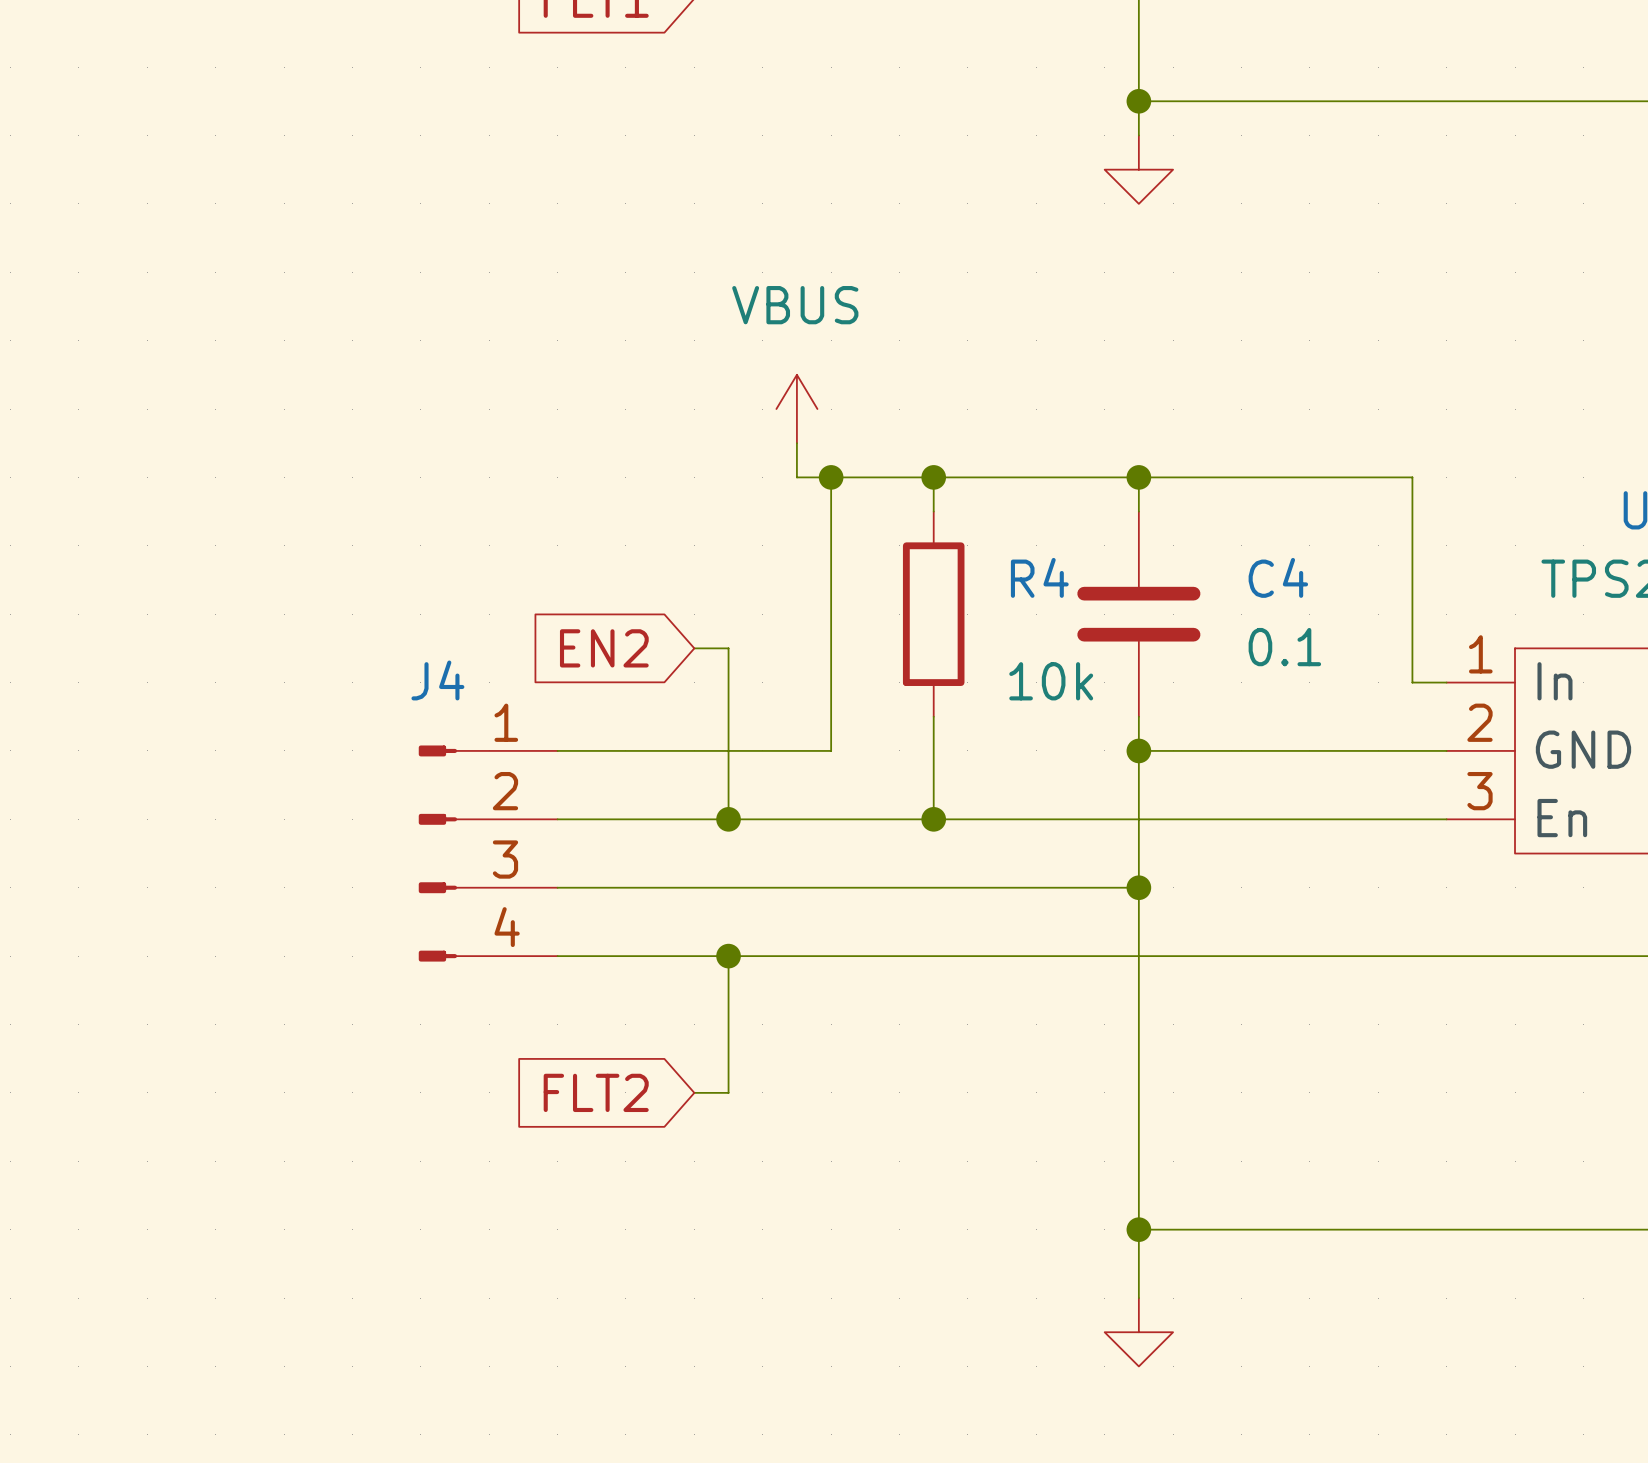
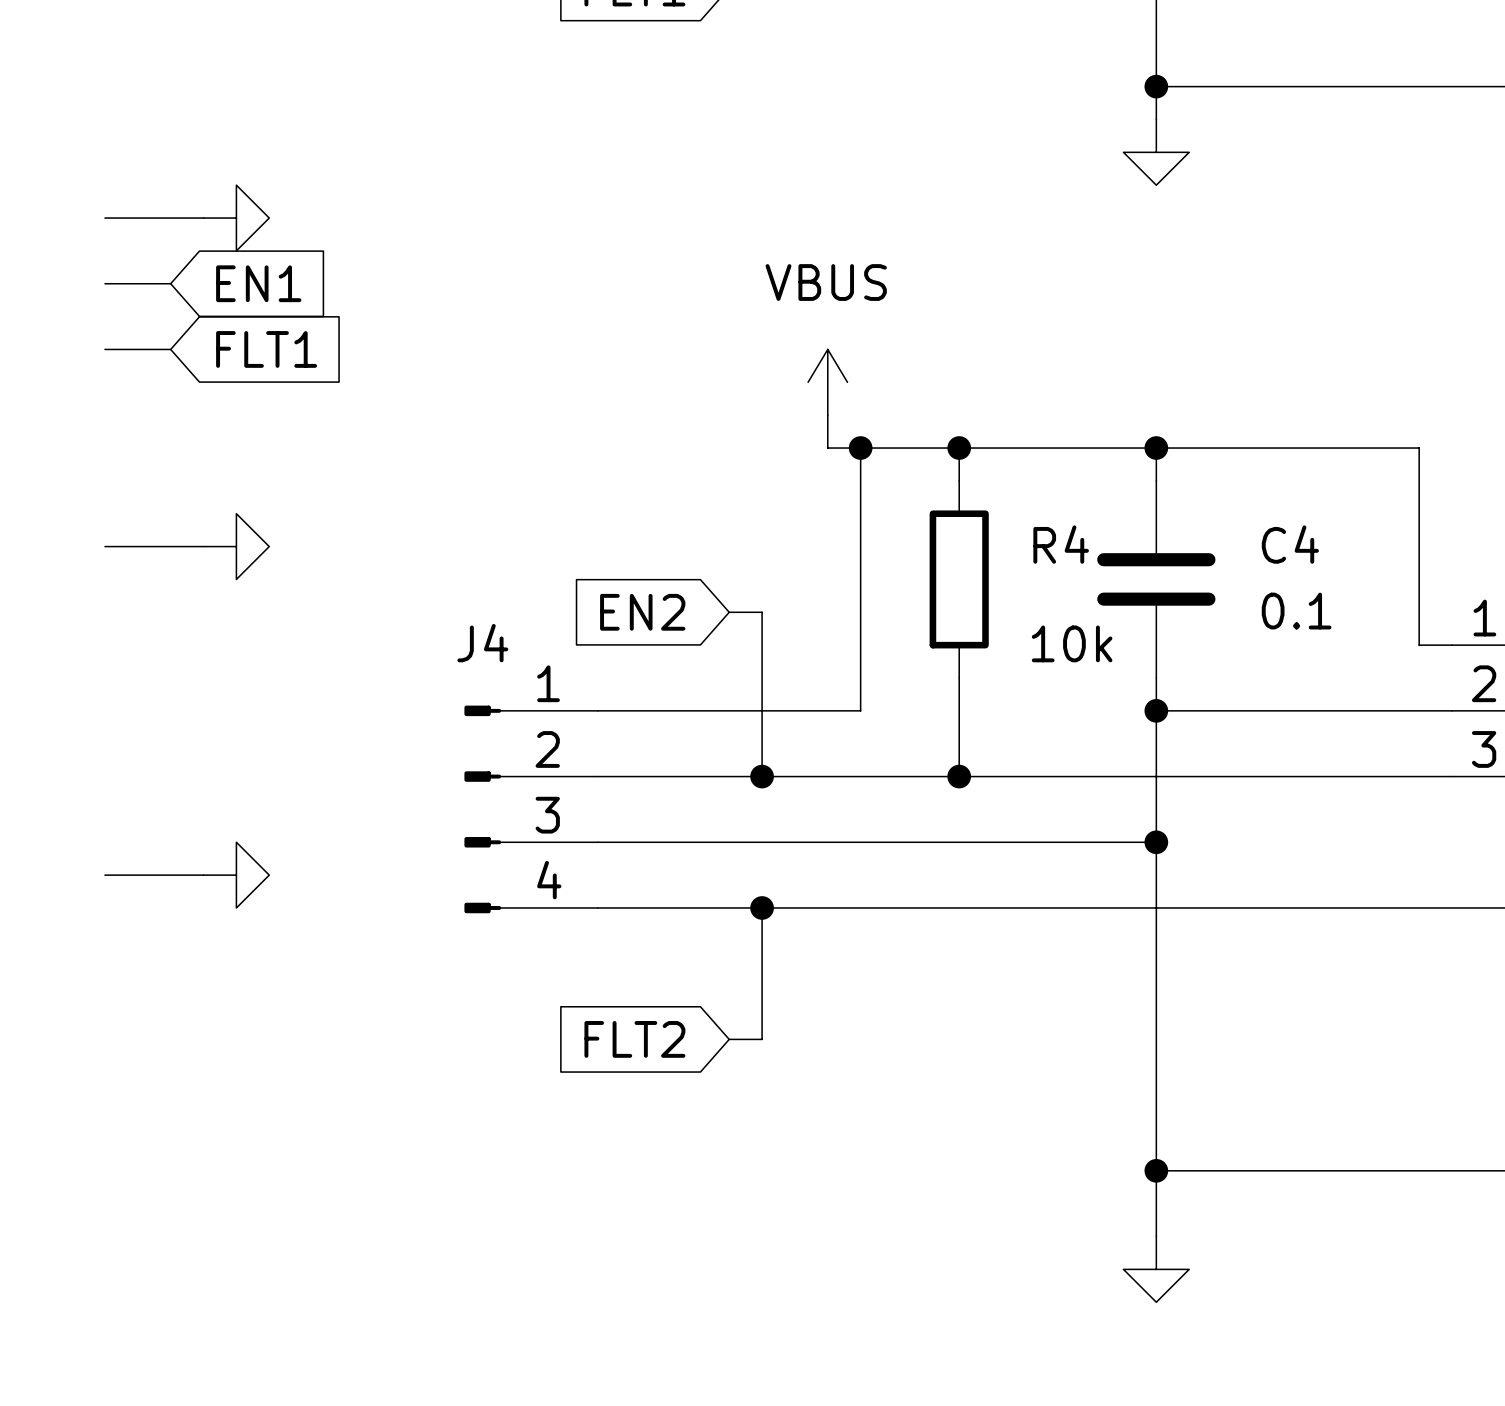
wire: none -> (104, 218) (203, 218)
power symbol: none -> (236, 218)
wire: none -> (104, 283) (170, 283)
global label: none -> EN1 (258, 283)
wire: none -> (104, 349) (170, 349)
global label: none -> FLT1 (266, 349)
wire: none -> (104, 546) (203, 546)
power symbol: none -> (236, 546)
wire: none -> (104, 875) (203, 875)
power symbol: none -> (236, 875)

